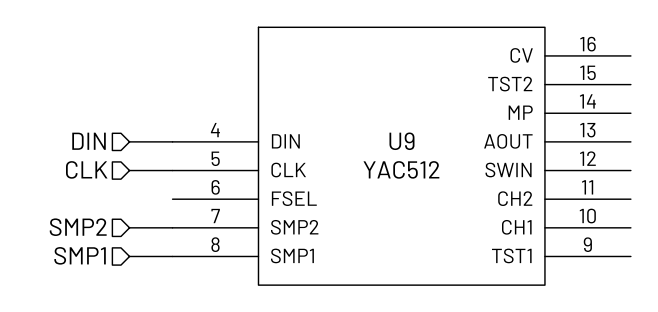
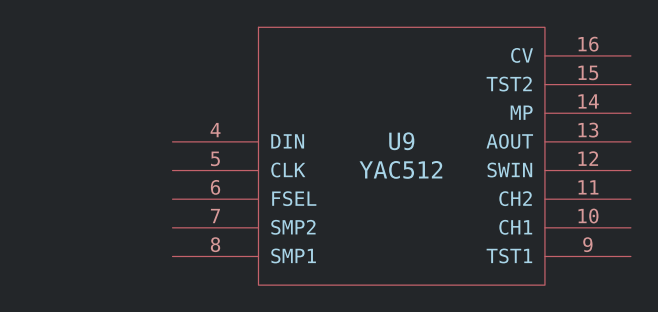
hierarchical label: DIN (89, 141) -> none
wire: (129, 141) (172, 141) -> none
hierarchical label: CLK (86, 169) -> none
wire: (129, 170) (172, 170) -> none
hierarchical label: SMP2 (78, 227) -> none
wire: (129, 227) (172, 227) -> none
hierarchical label: SMP1 (80, 255) -> none
wire: (129, 256) (172, 256) -> none

